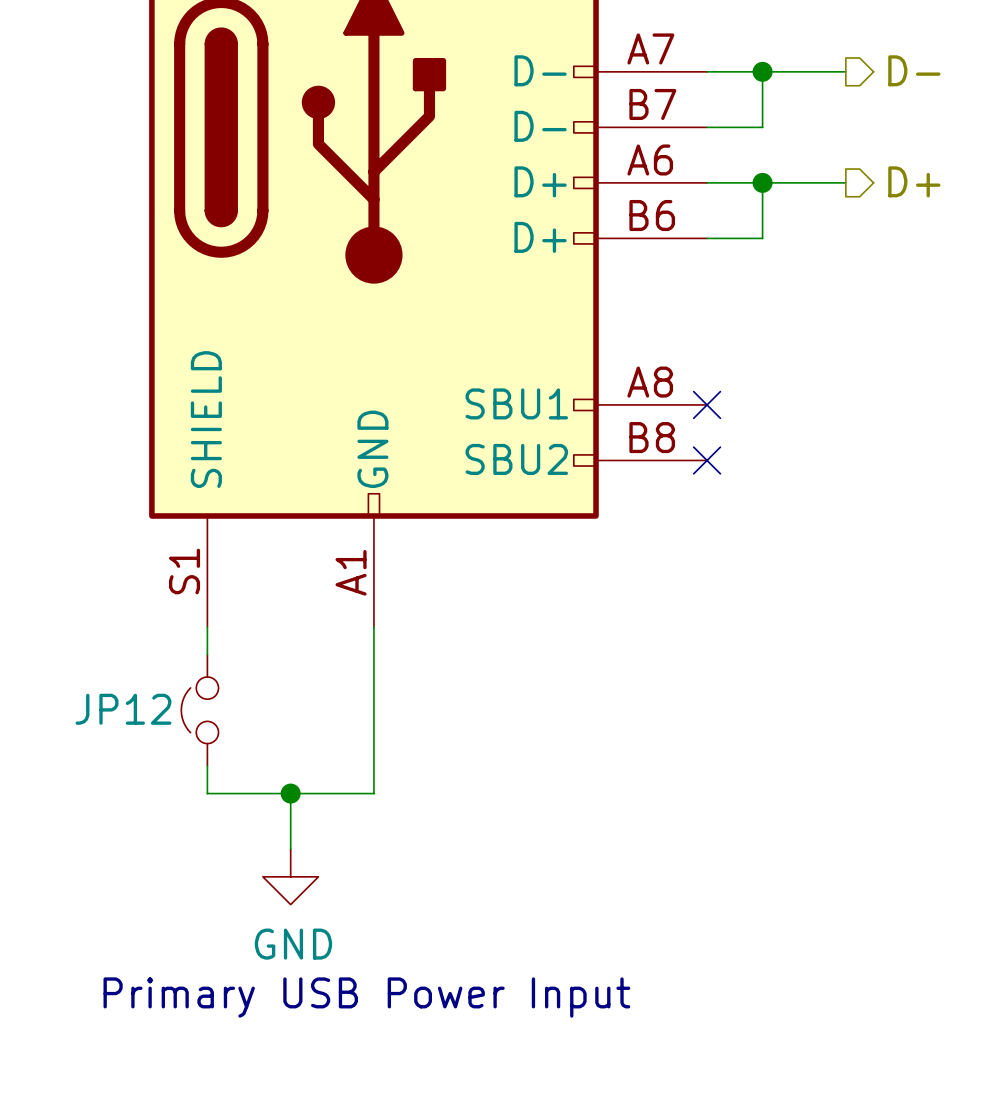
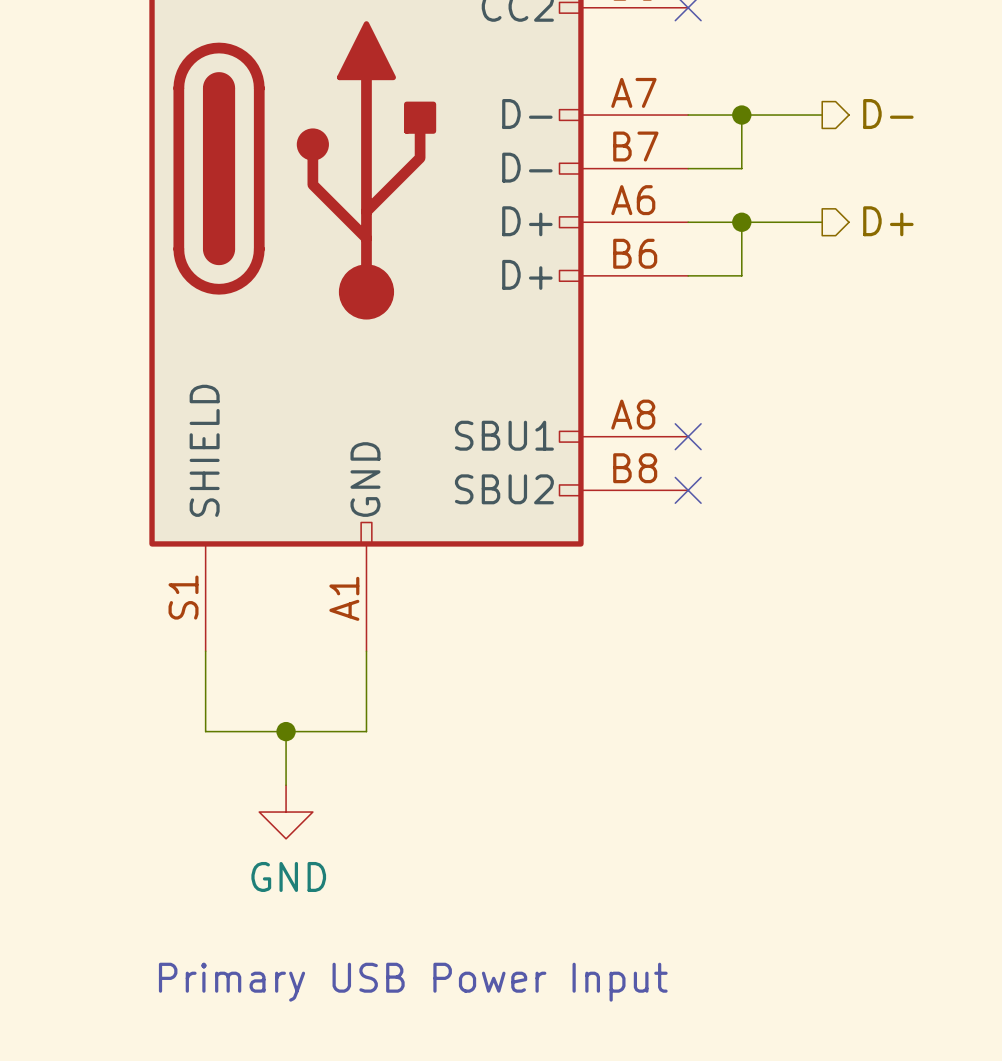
JP12: (199, 710) -> none
wire: (373, 710) (373, 793) (207, 793) (207, 765) -> (366, 731) (205, 731) (205, 677)
wire: (290, 793) (290, 849) -> (286, 731) (286, 785)
junction position: (290, 793) -> (286, 731)
power symbol position: GND (290, 876) -> GND (286, 812)
text position: Primary USB Power Input (366, 997) -> Primary USB Power Input (413, 982)

